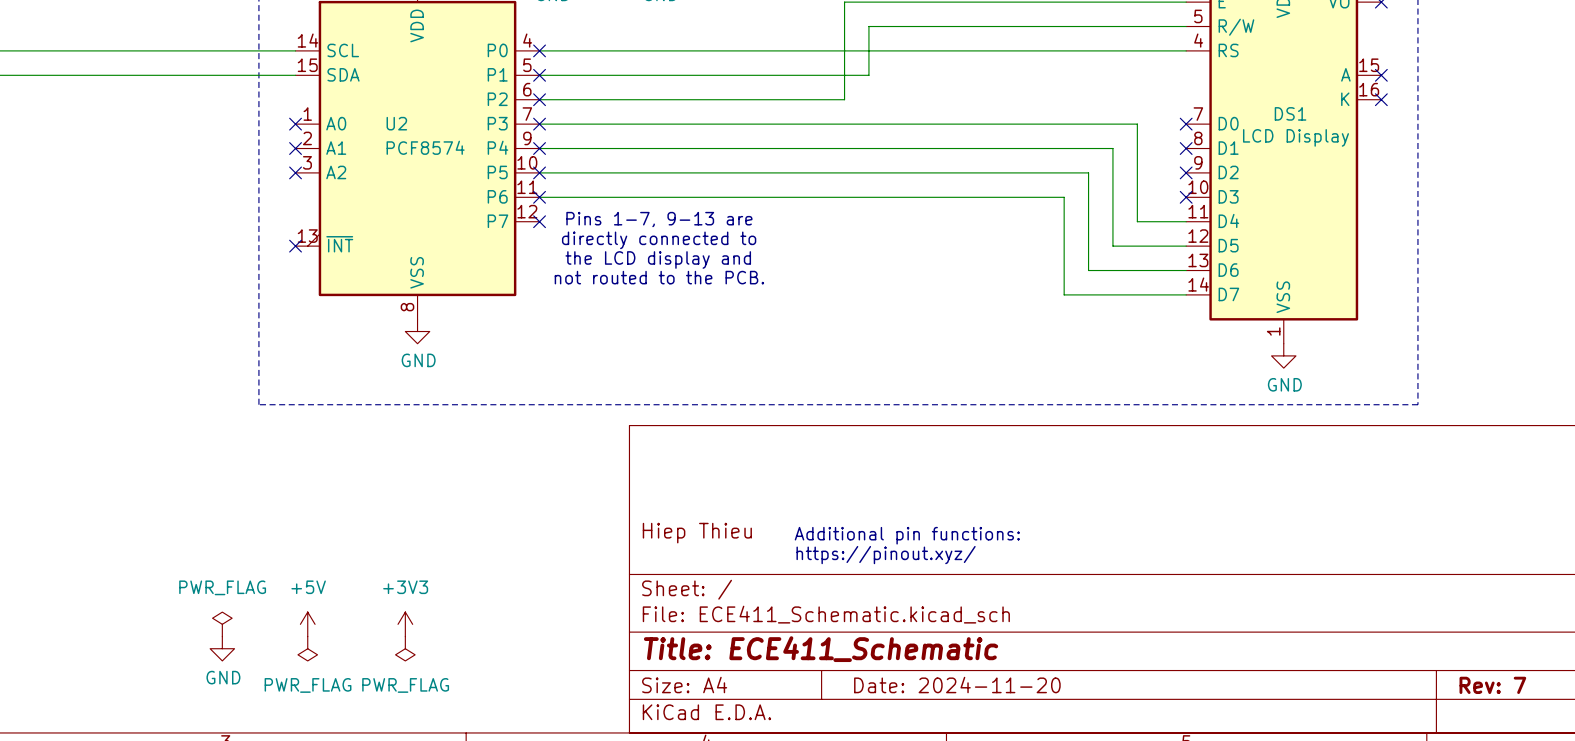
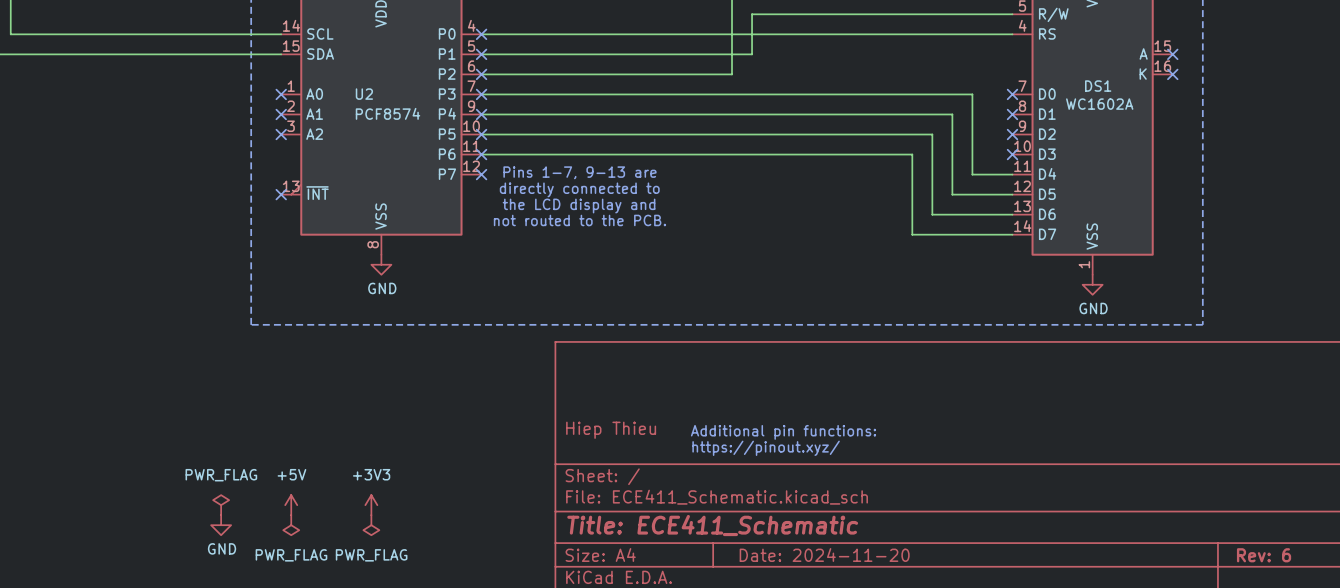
DS1 value: LCD Display (1296, 137) -> WC1602A (1099, 104)
title block: Rev: 7 (1492, 685) -> Rev: 6 (1264, 555)

